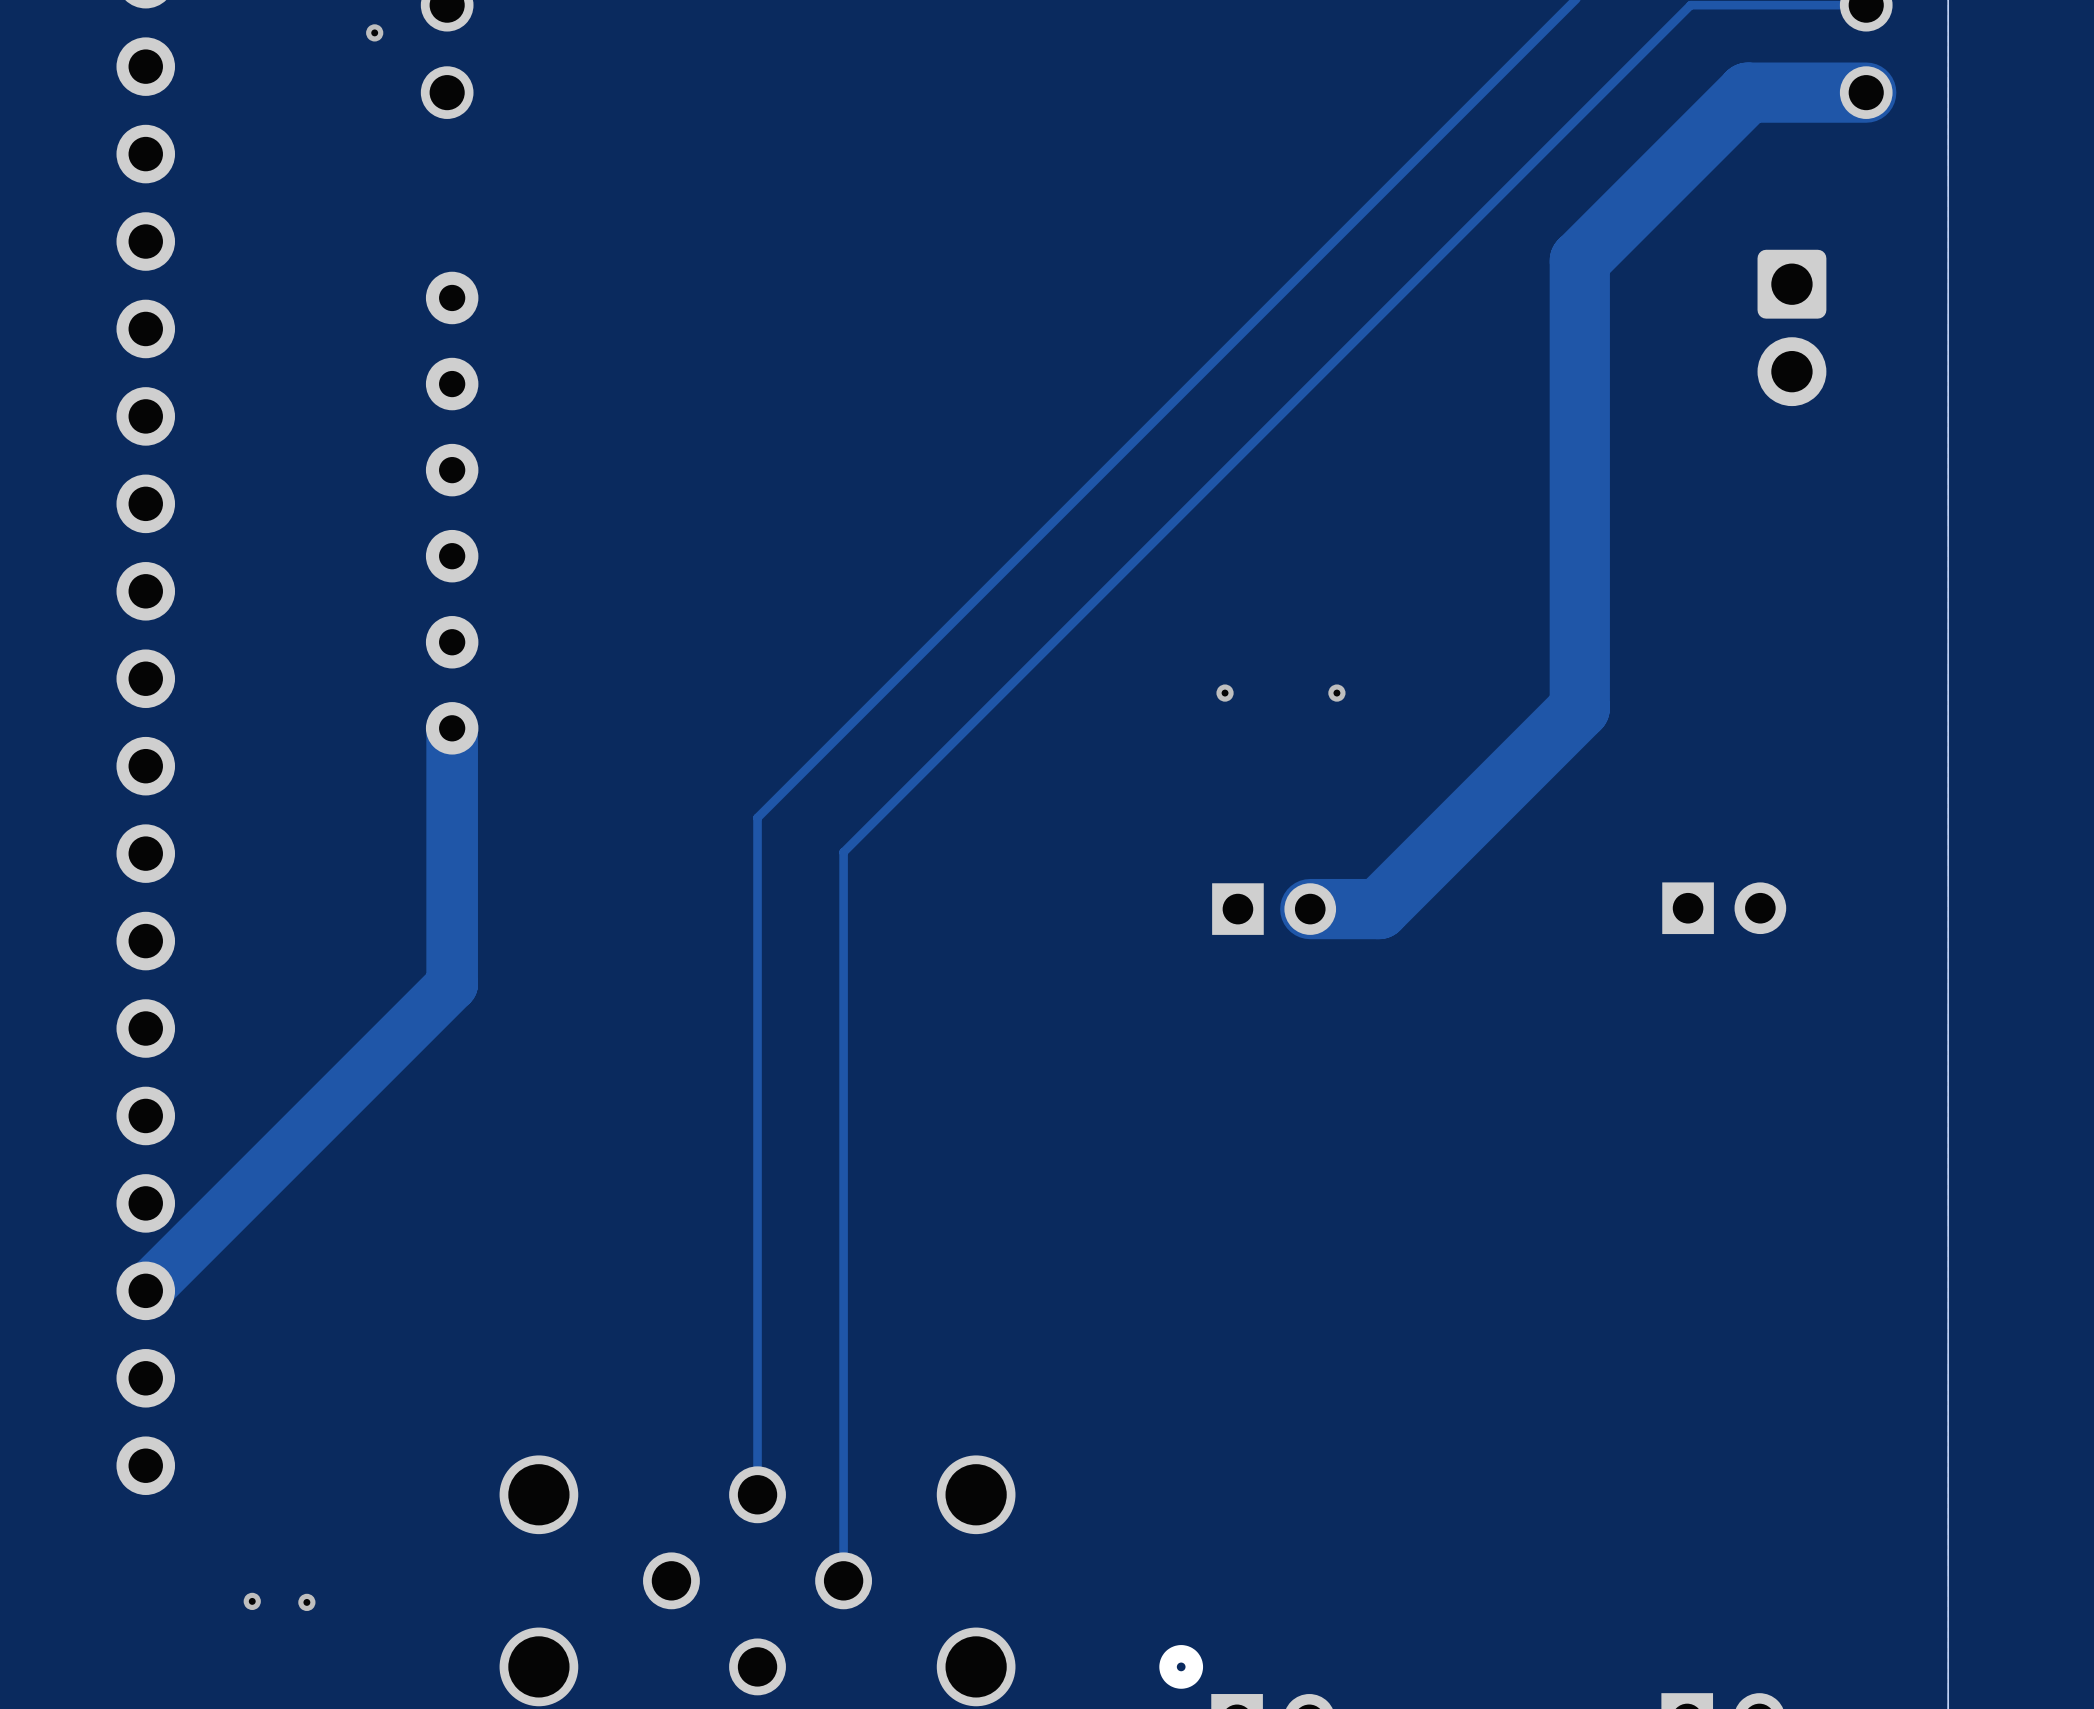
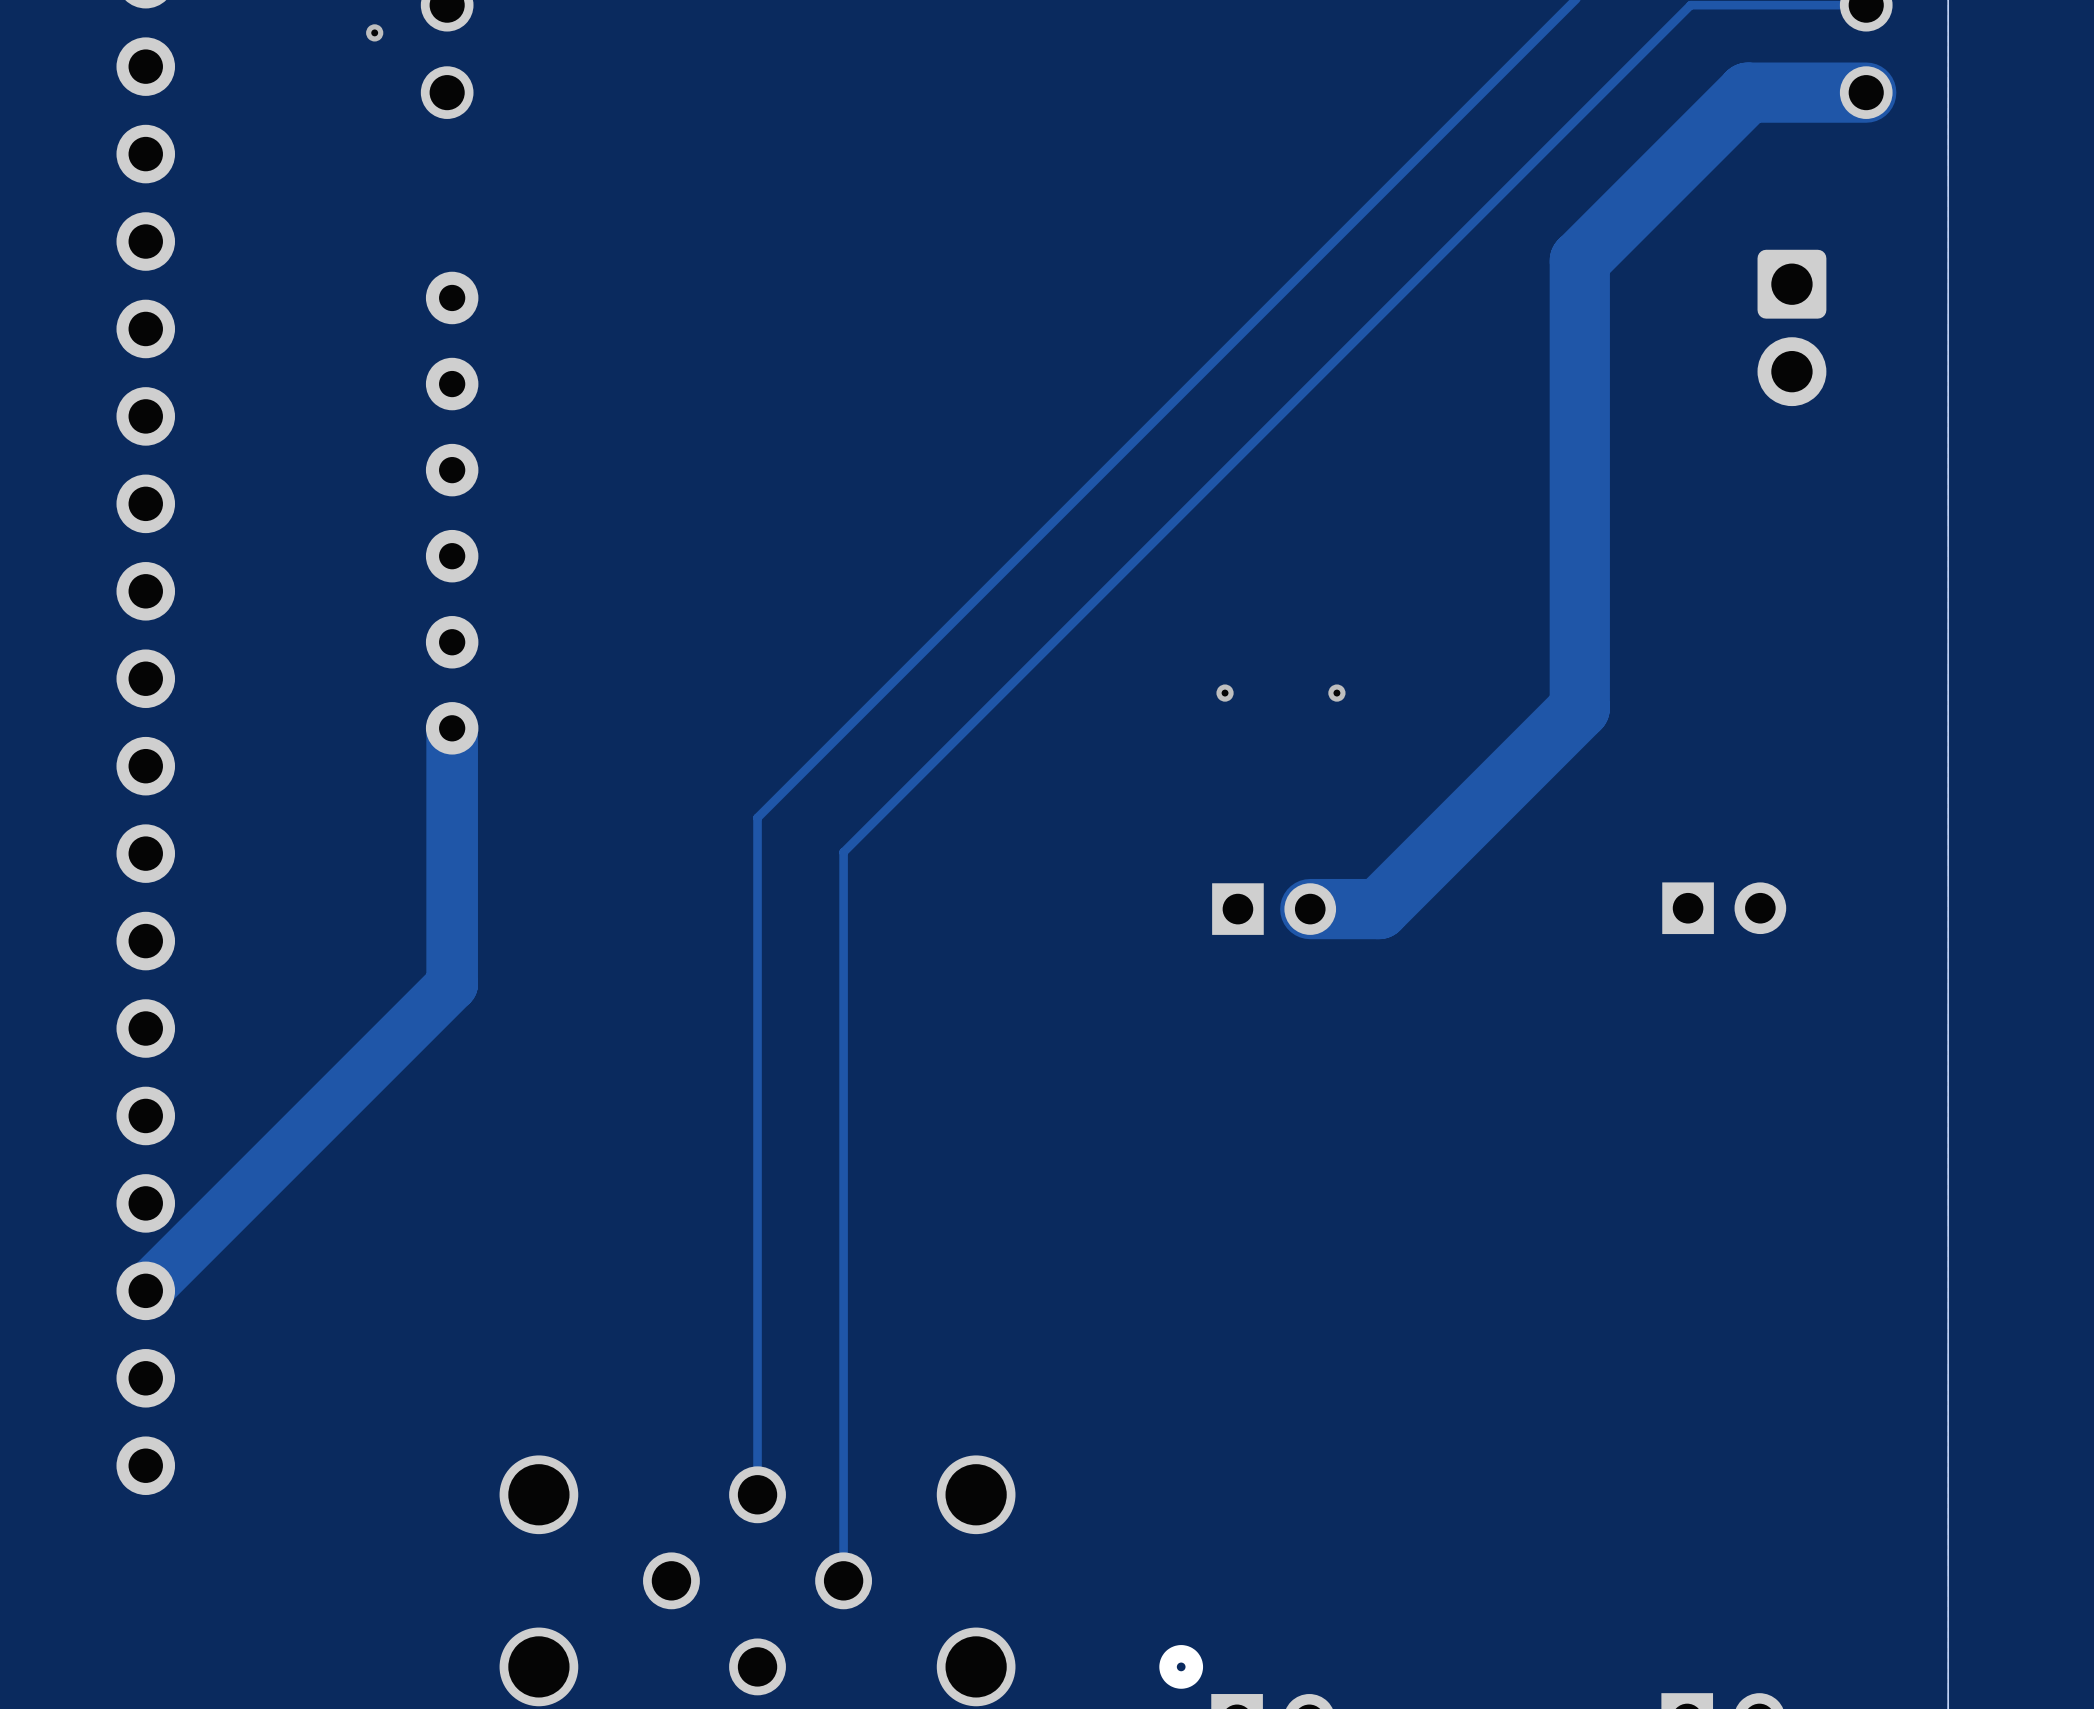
via: (252, 1601) -> none
via: (306, 1602) -> none

